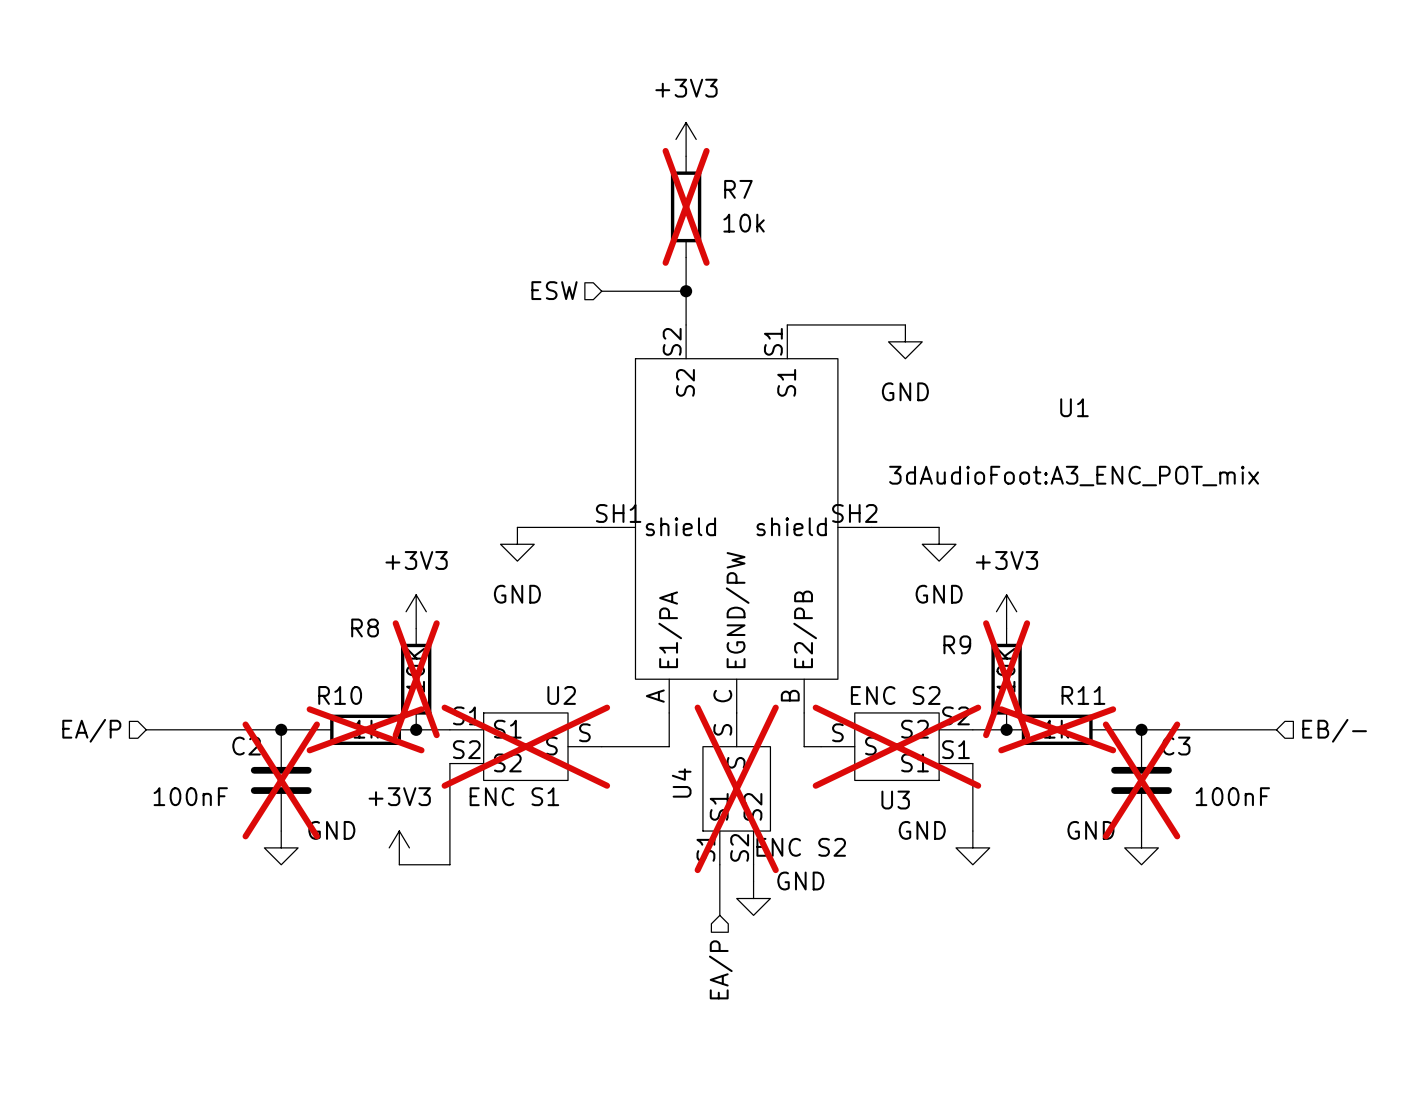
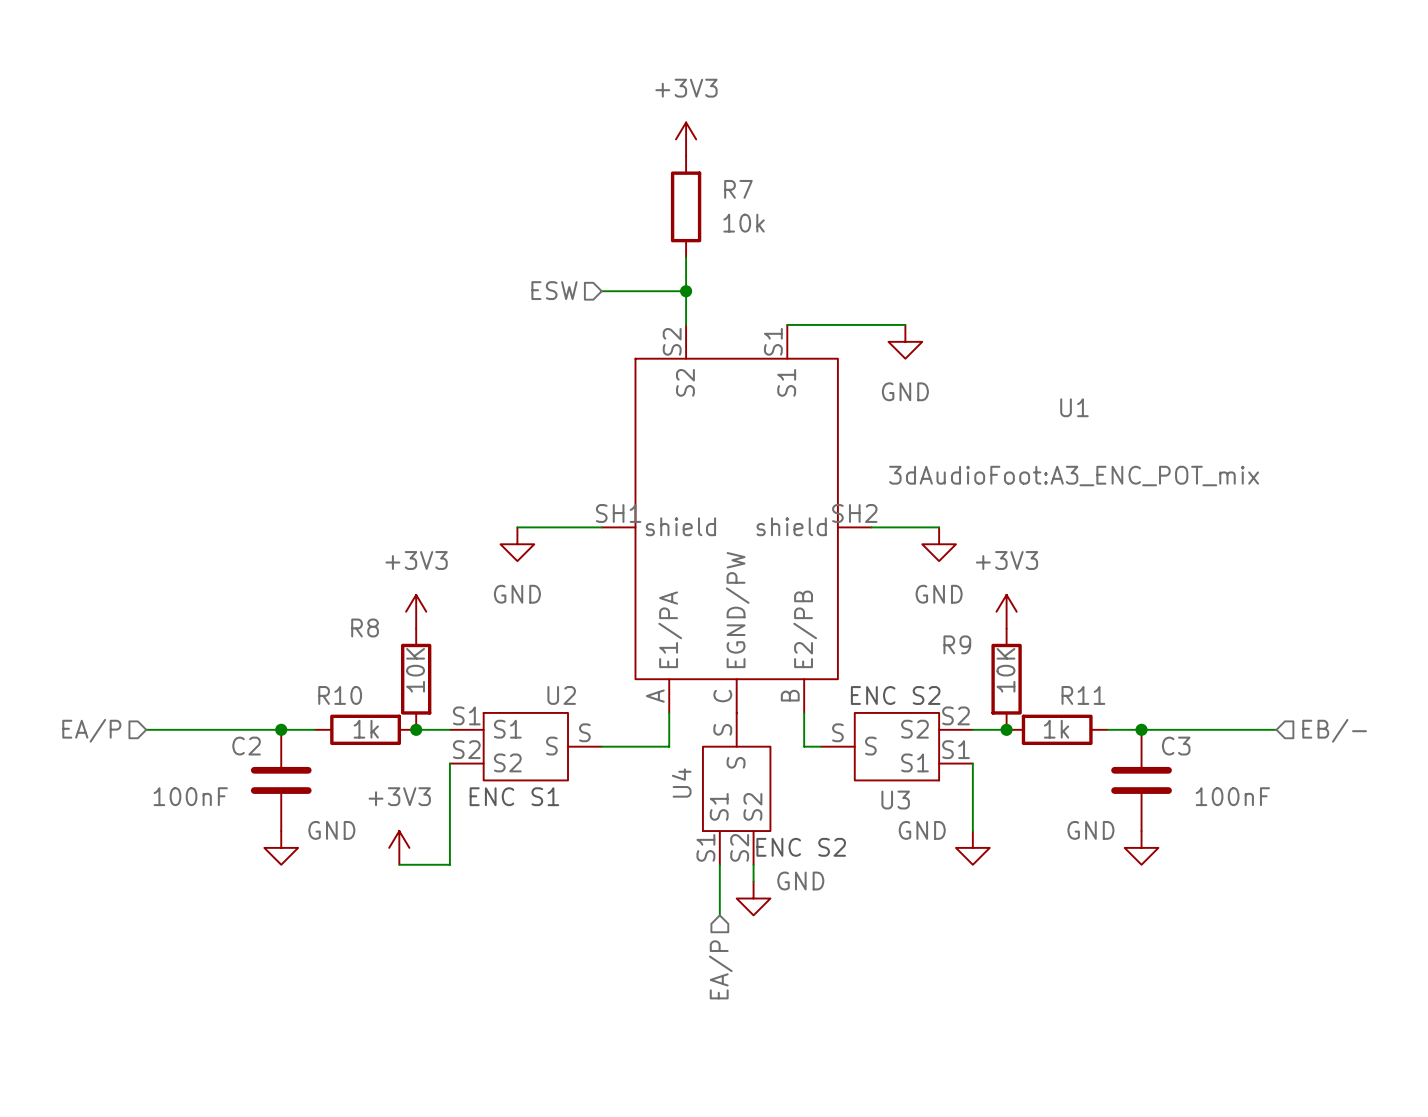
R7 do-not-place cross: (686, 206) -> none
R8 do-not-place cross: (416, 679) -> none
R9 do-not-place cross: (1006, 679) -> none
R10 do-not-place cross: (365, 729) -> none
R11 do-not-place cross: (1057, 729) -> none
U2 do-not-place cross: (525, 746) -> none
U3 do-not-place cross: (896, 746) -> none
C2 do-not-place cross: (281, 780) -> none
C3 do-not-place cross: (1141, 780) -> none
U4 do-not-place cross: (736, 788) -> none

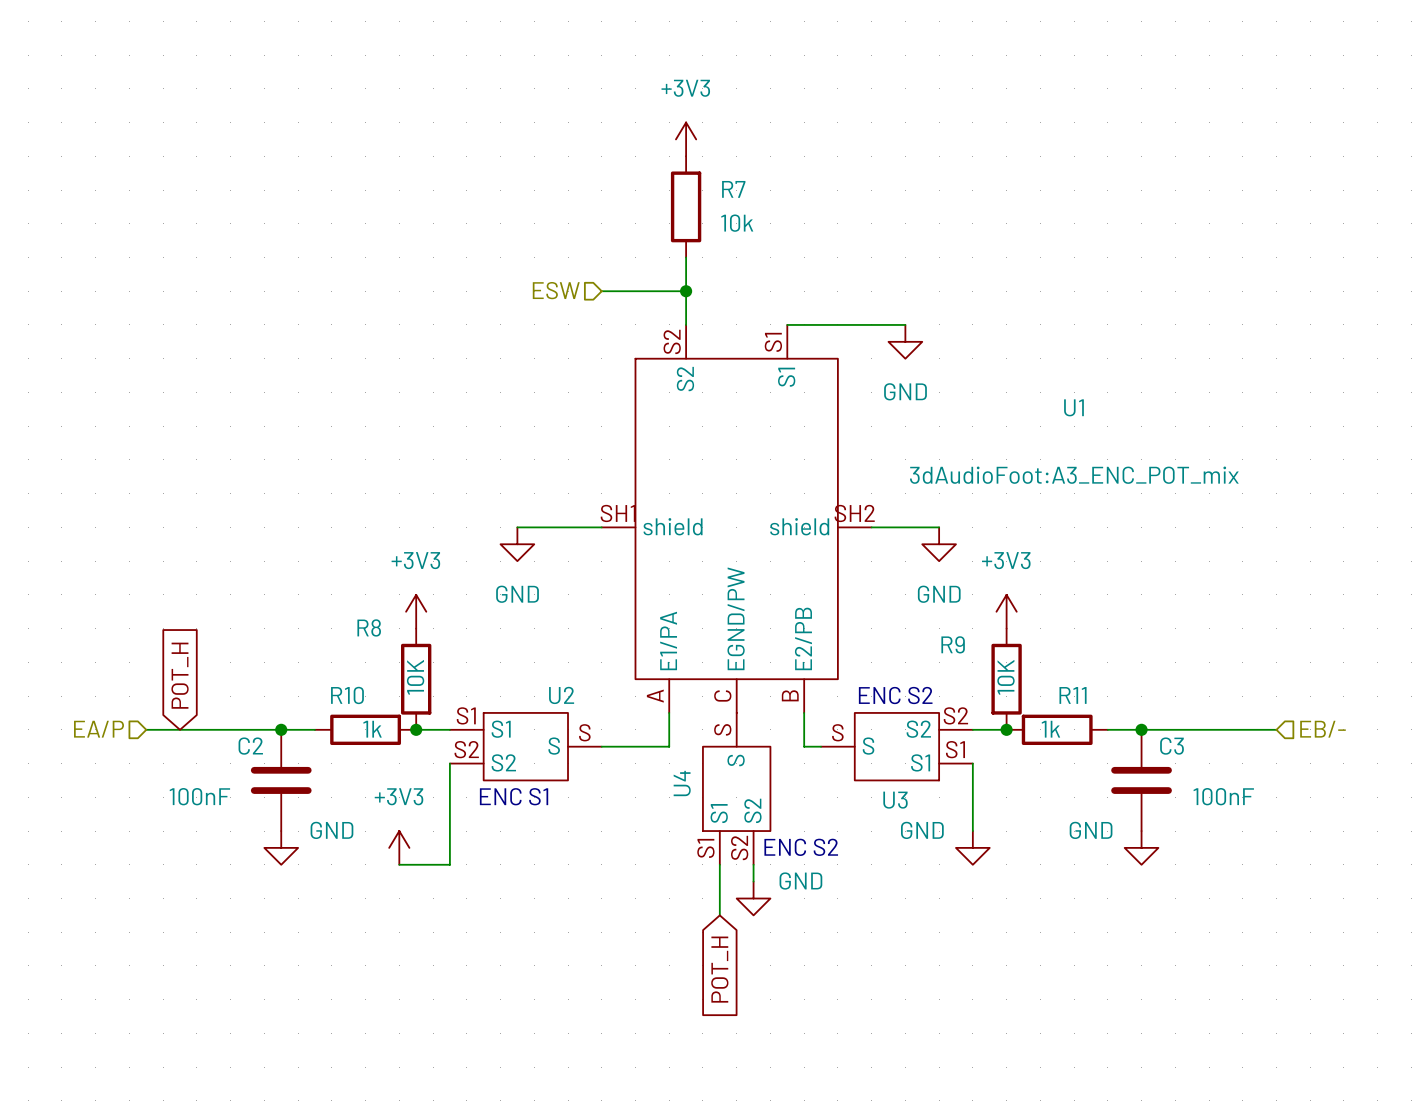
global label: none -> POT_H (180, 675)
hierarchical label: EA/P (720, 969) -> none
global label: none -> POT_H (719, 969)

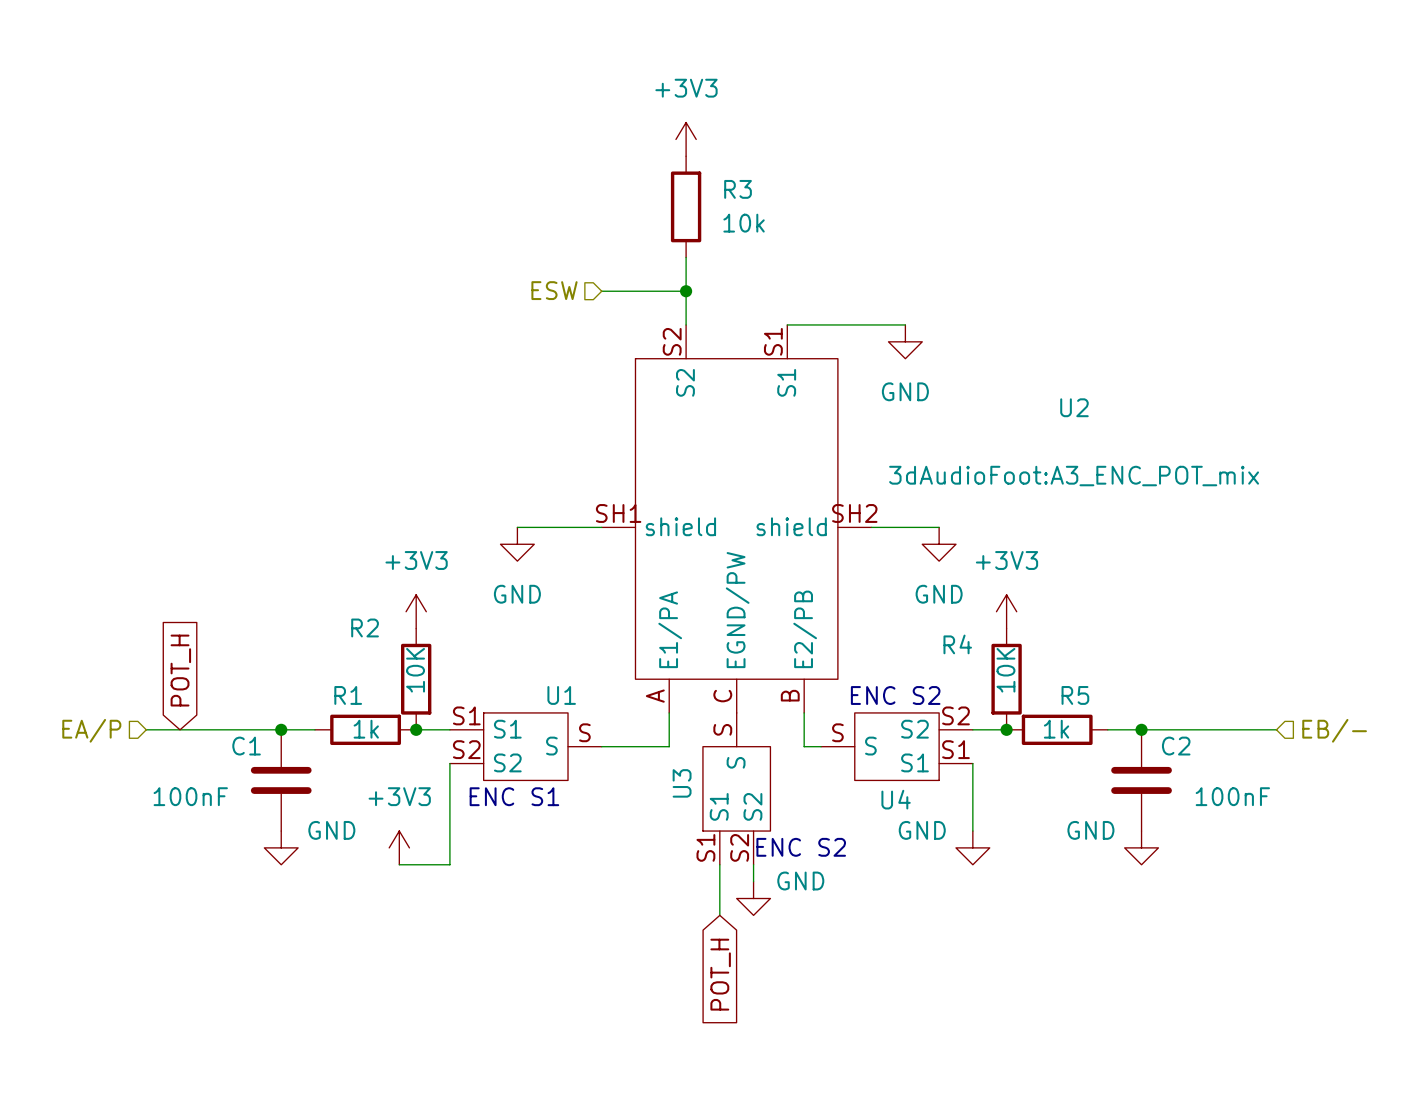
R7 name: R7 (733, 189) -> R3 (738, 189)
U1 name: U1 (1073, 407) -> U2 (1074, 407)
R8 name: R8 (369, 627) -> R2 (365, 627)
R9 name: R9 (953, 644) -> R4 (957, 644)
R10 name: R10 (347, 695) -> R1 (348, 695)
U2 name: U2 (561, 695) -> U1 (561, 695)
R11 name: R11 (1073, 695) -> R5 (1075, 695)
C2 name: C2 (250, 746) -> C1 (246, 746)
C3 name: C3 (1172, 746) -> C2 (1176, 746)
U4 name: U4 (682, 783) -> U3 (682, 783)
U3 name: U3 (895, 800) -> U4 (896, 799)

